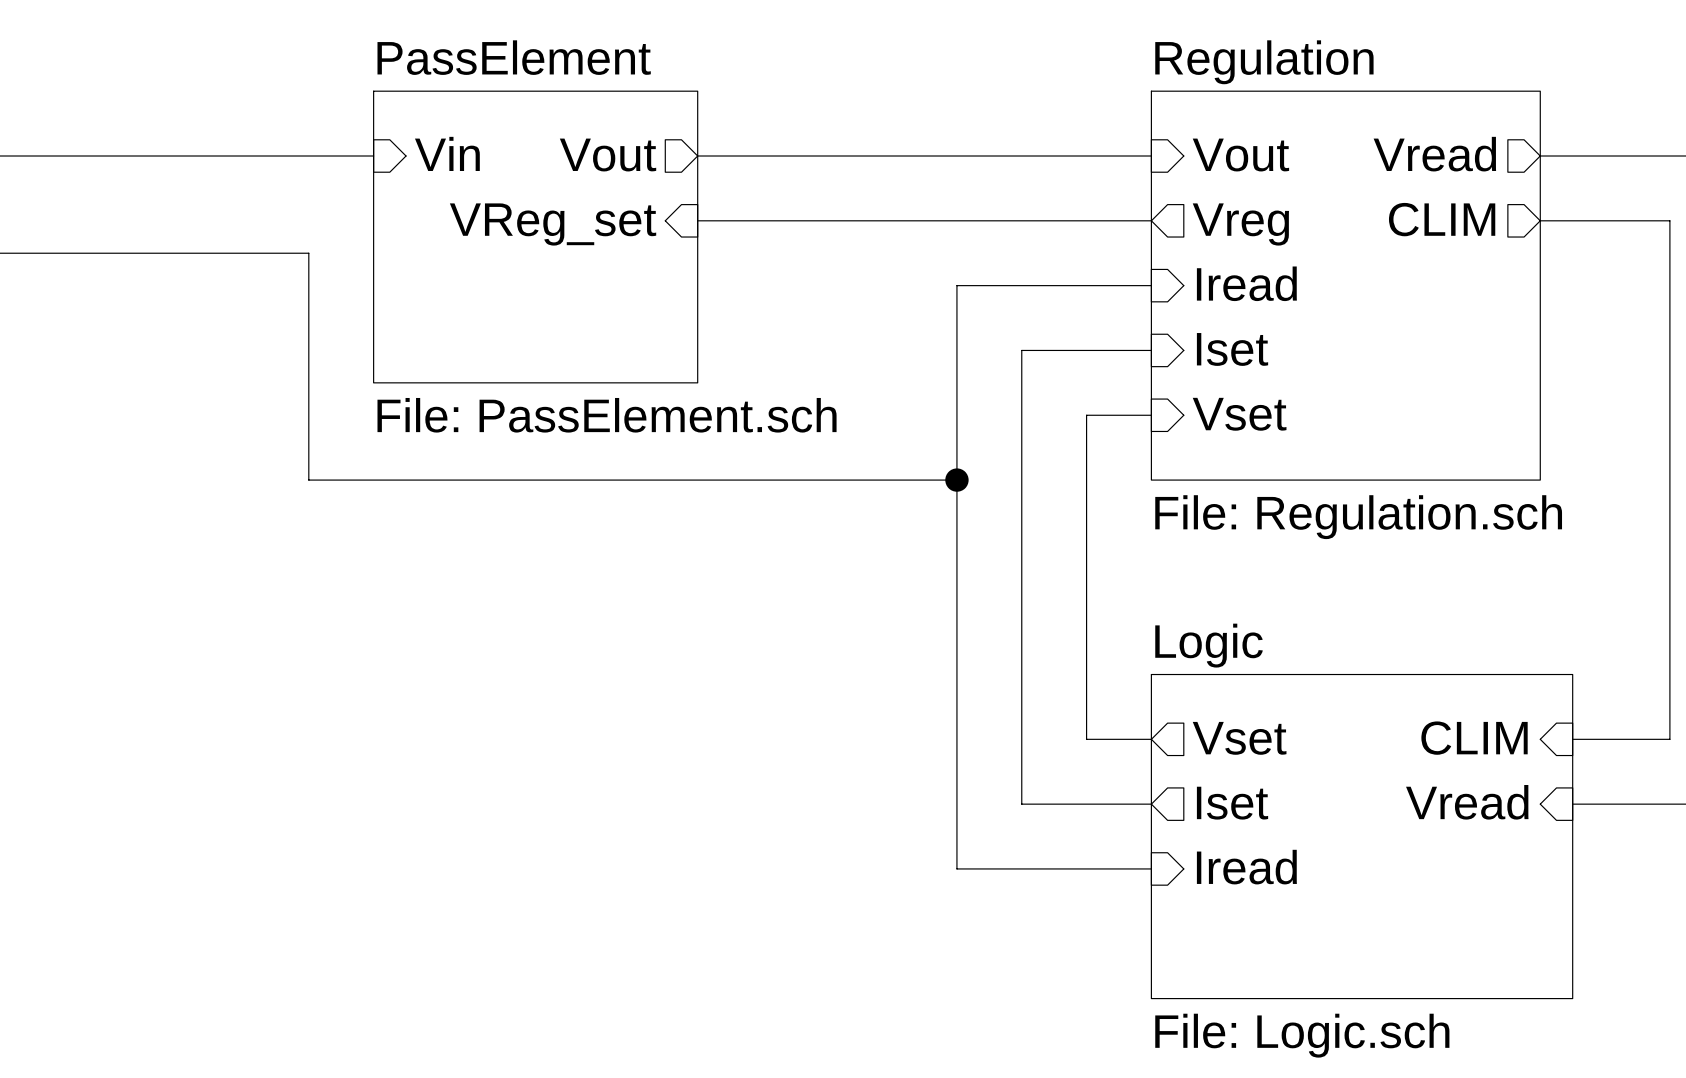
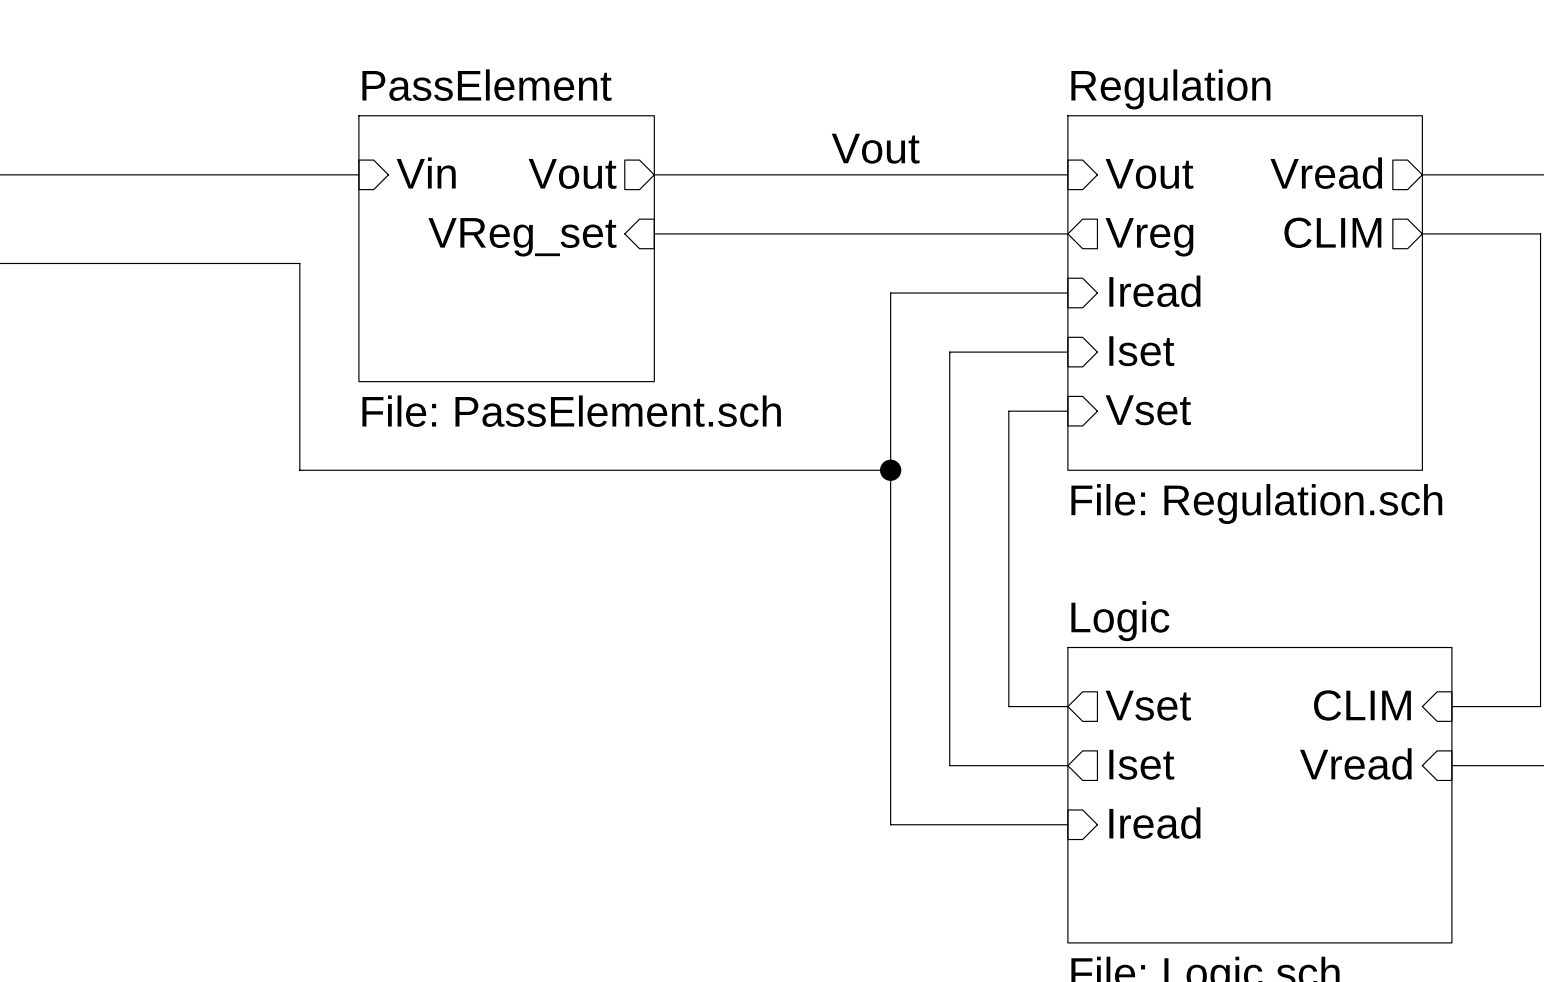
label: none -> Vout (875, 148)

